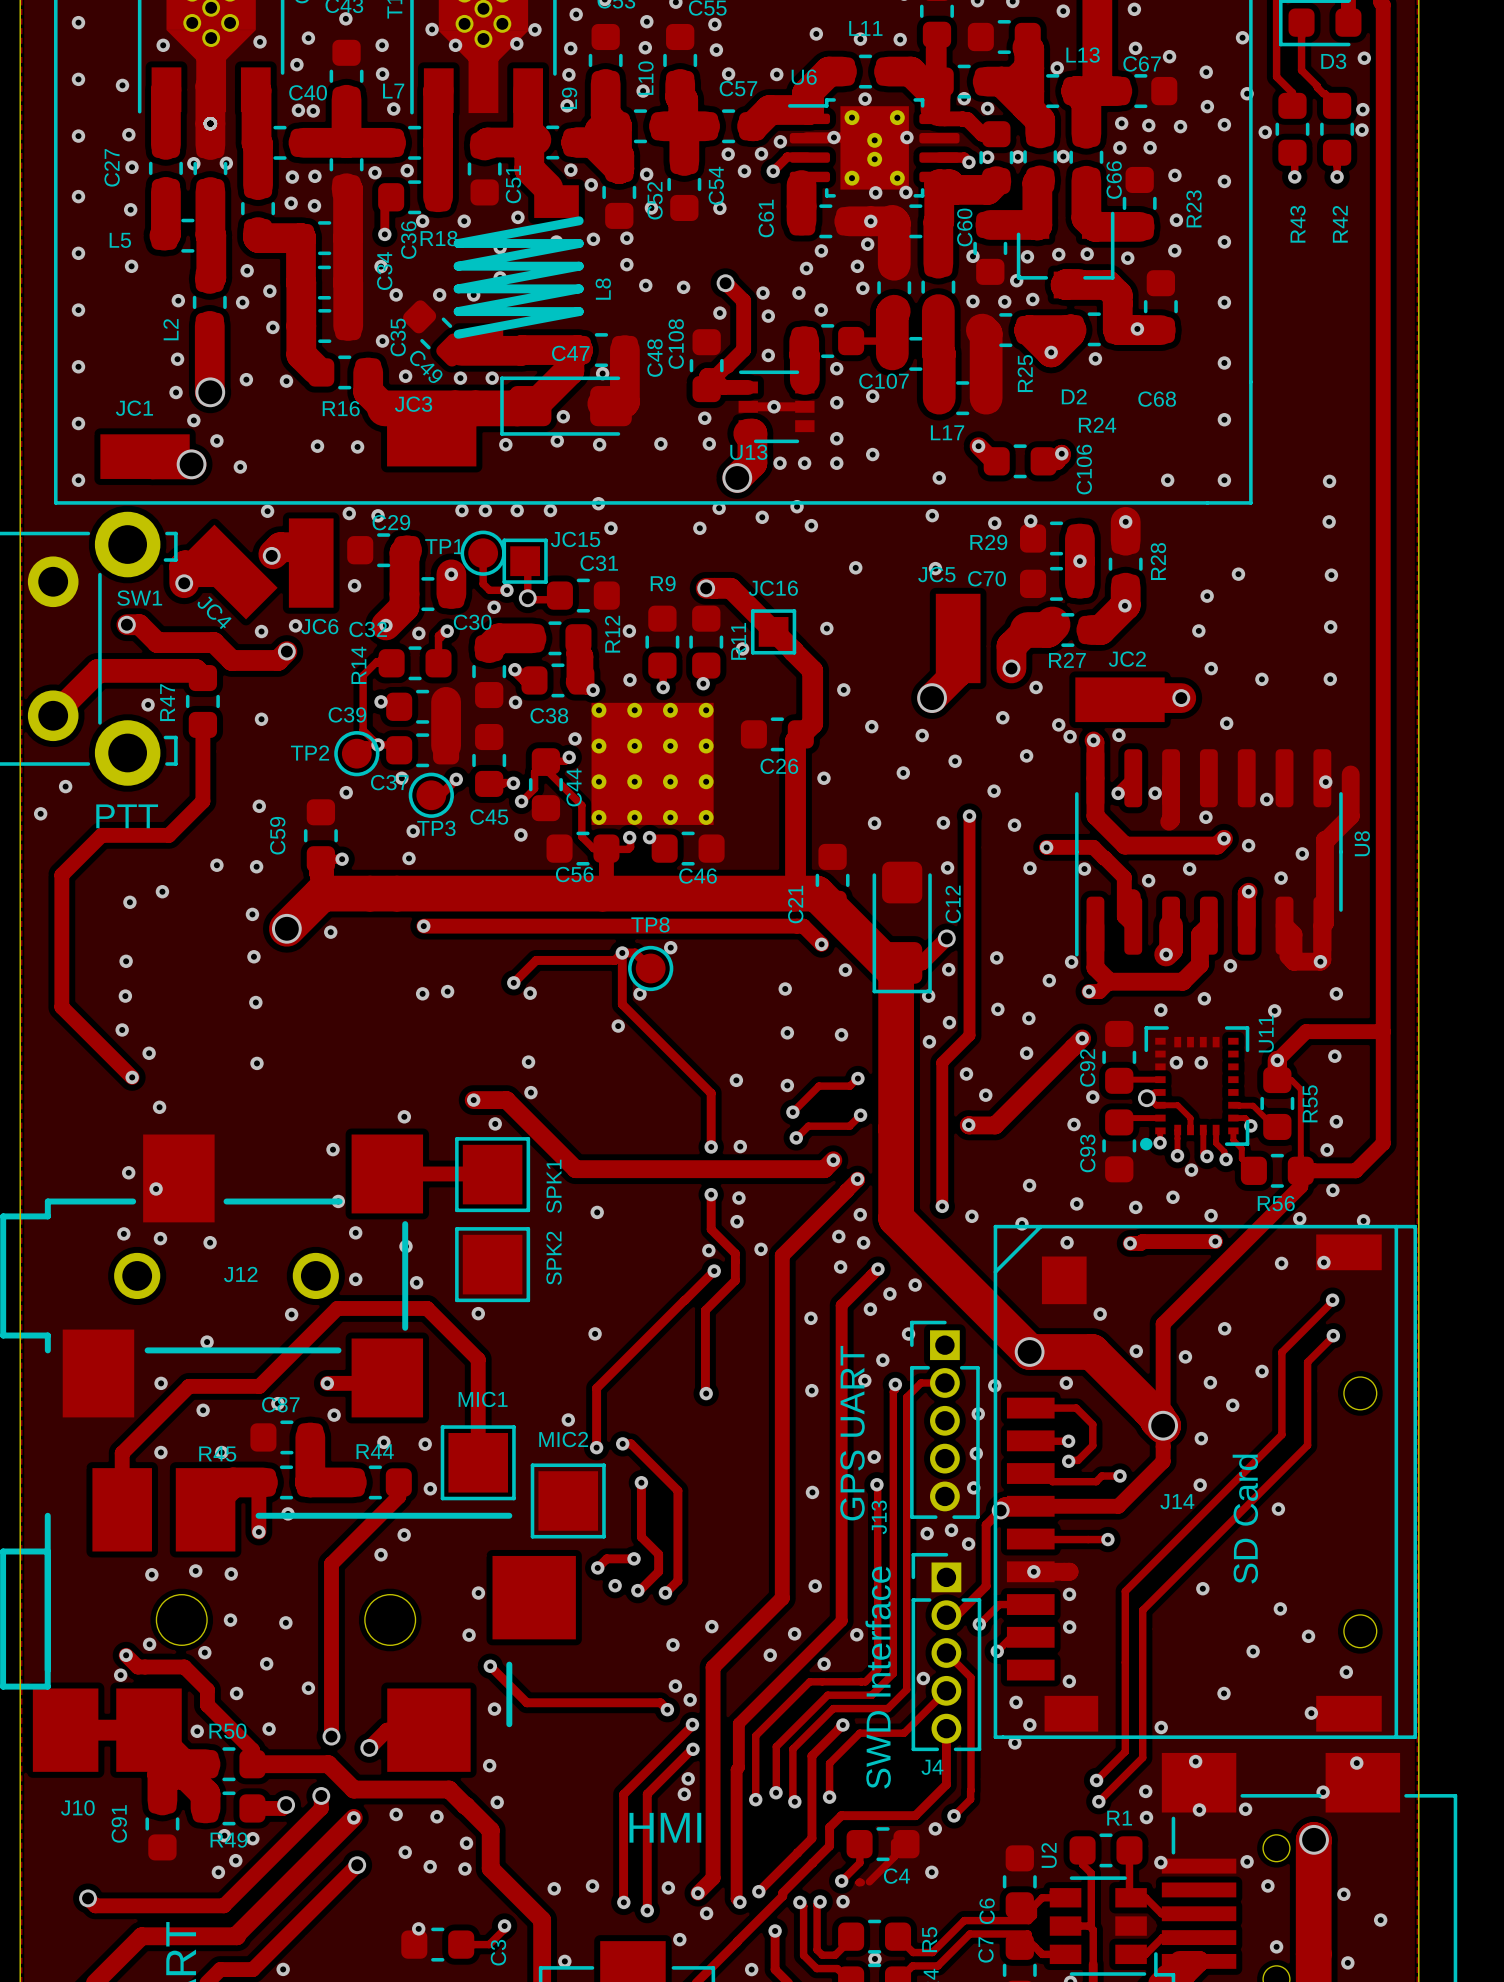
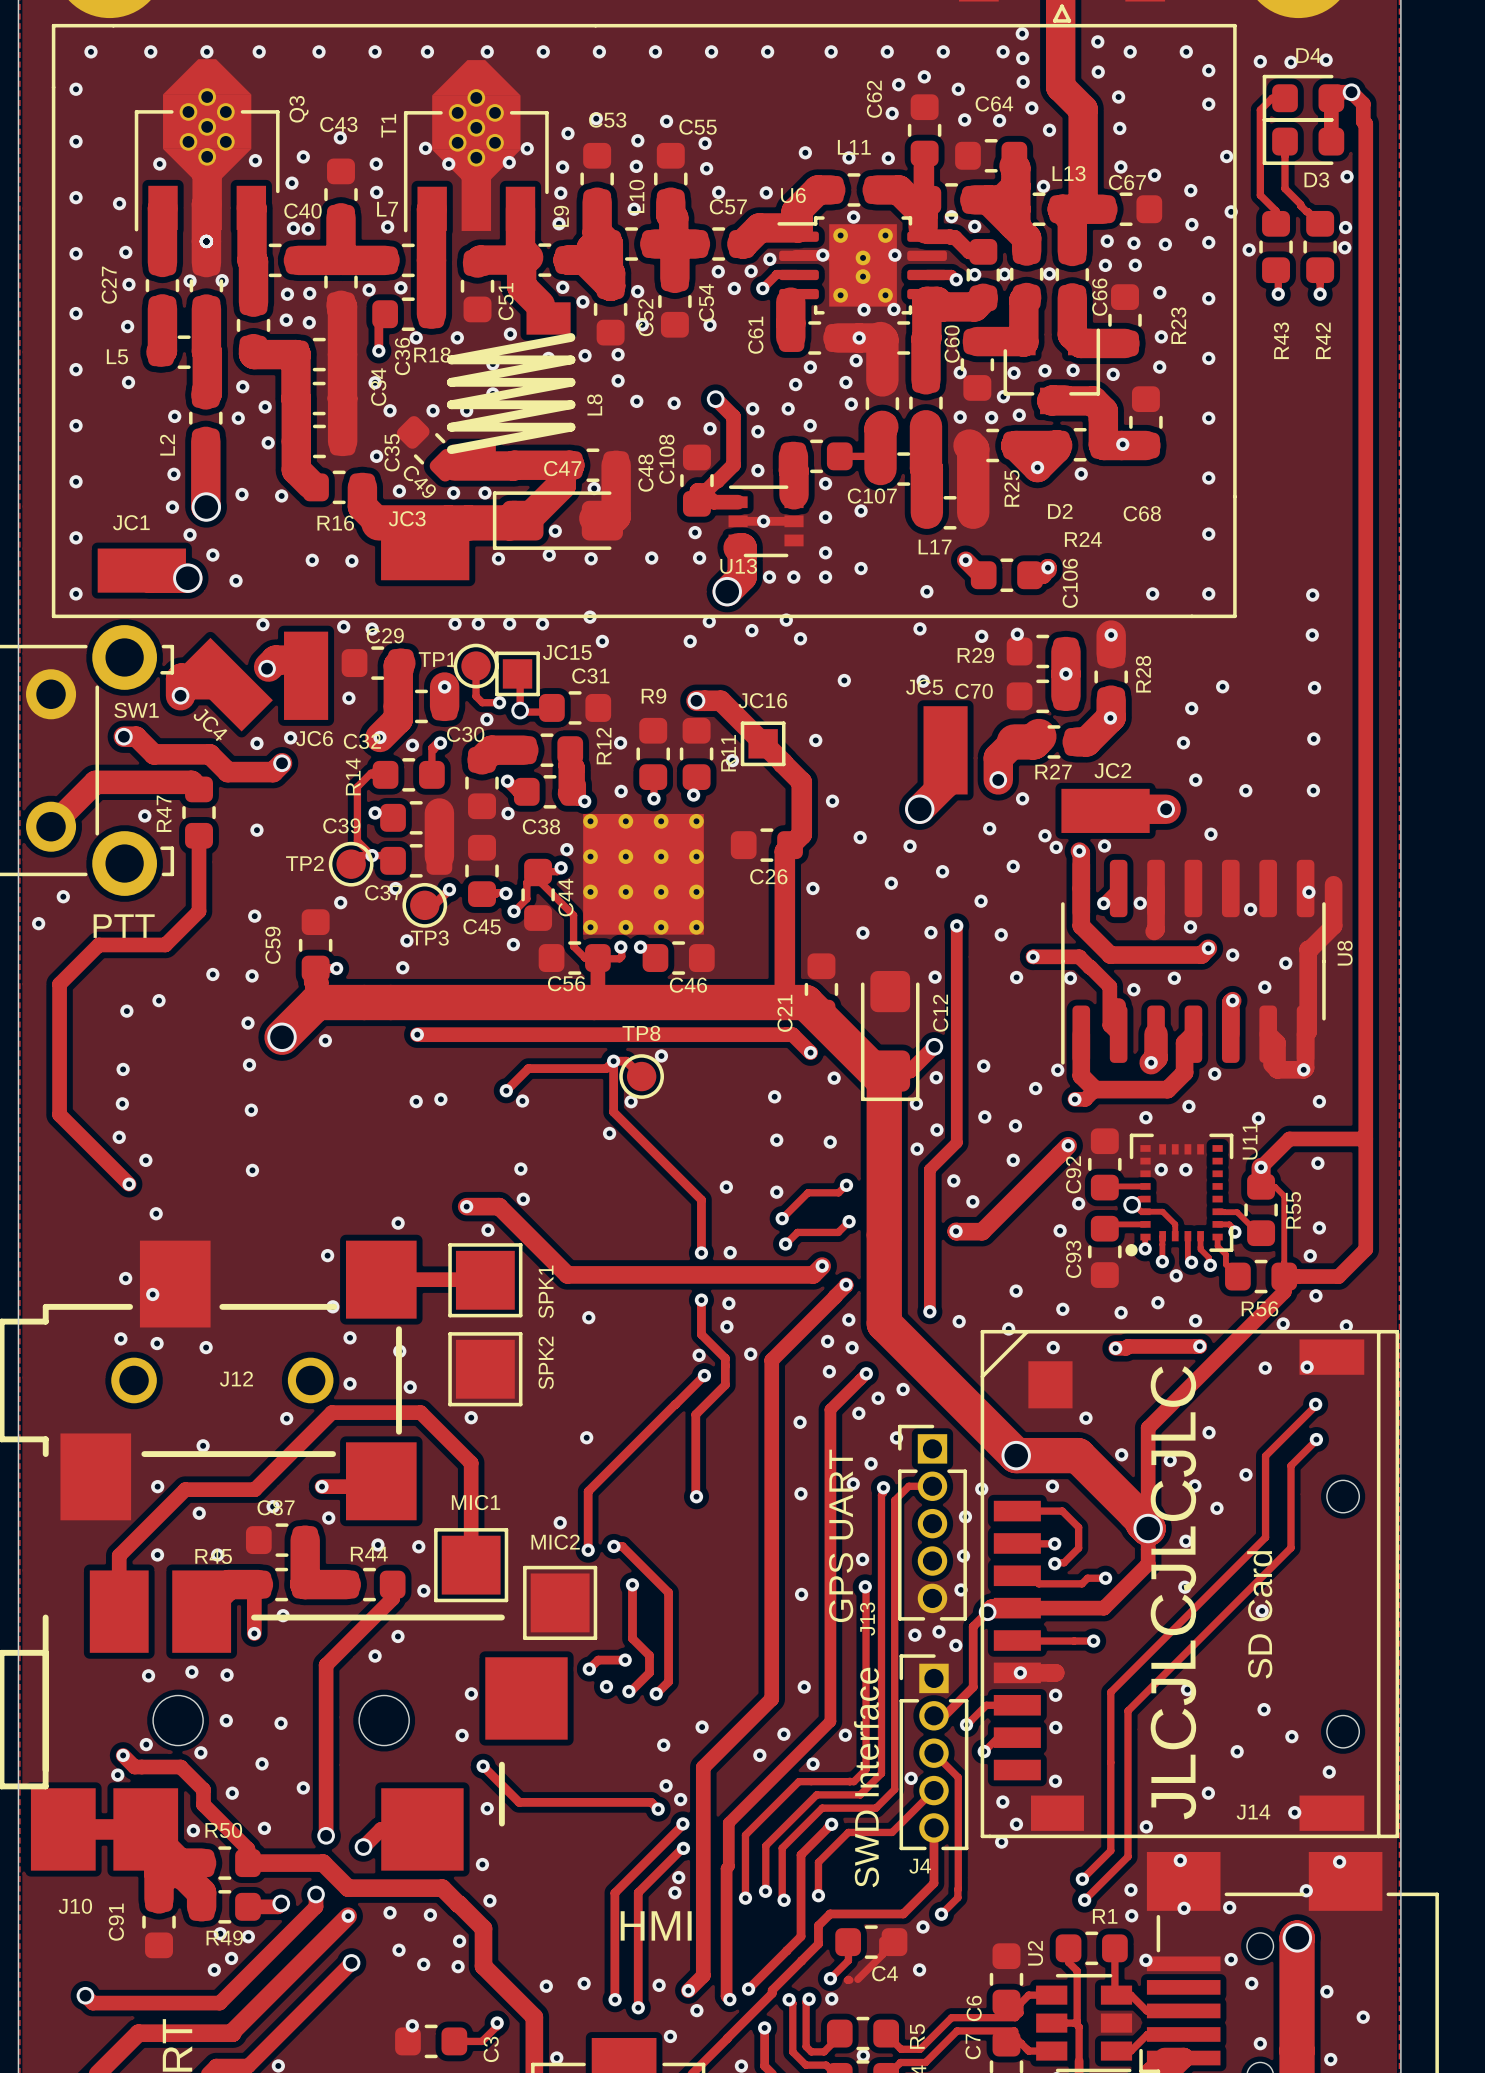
text: none -> JLCJLCJLCJLC (1173, 1592)
J14 name position: J14 (1177, 1501) -> J14 (1253, 1812)
text position: SD Card (1245, 1519) -> SD Card (1259, 1614)

